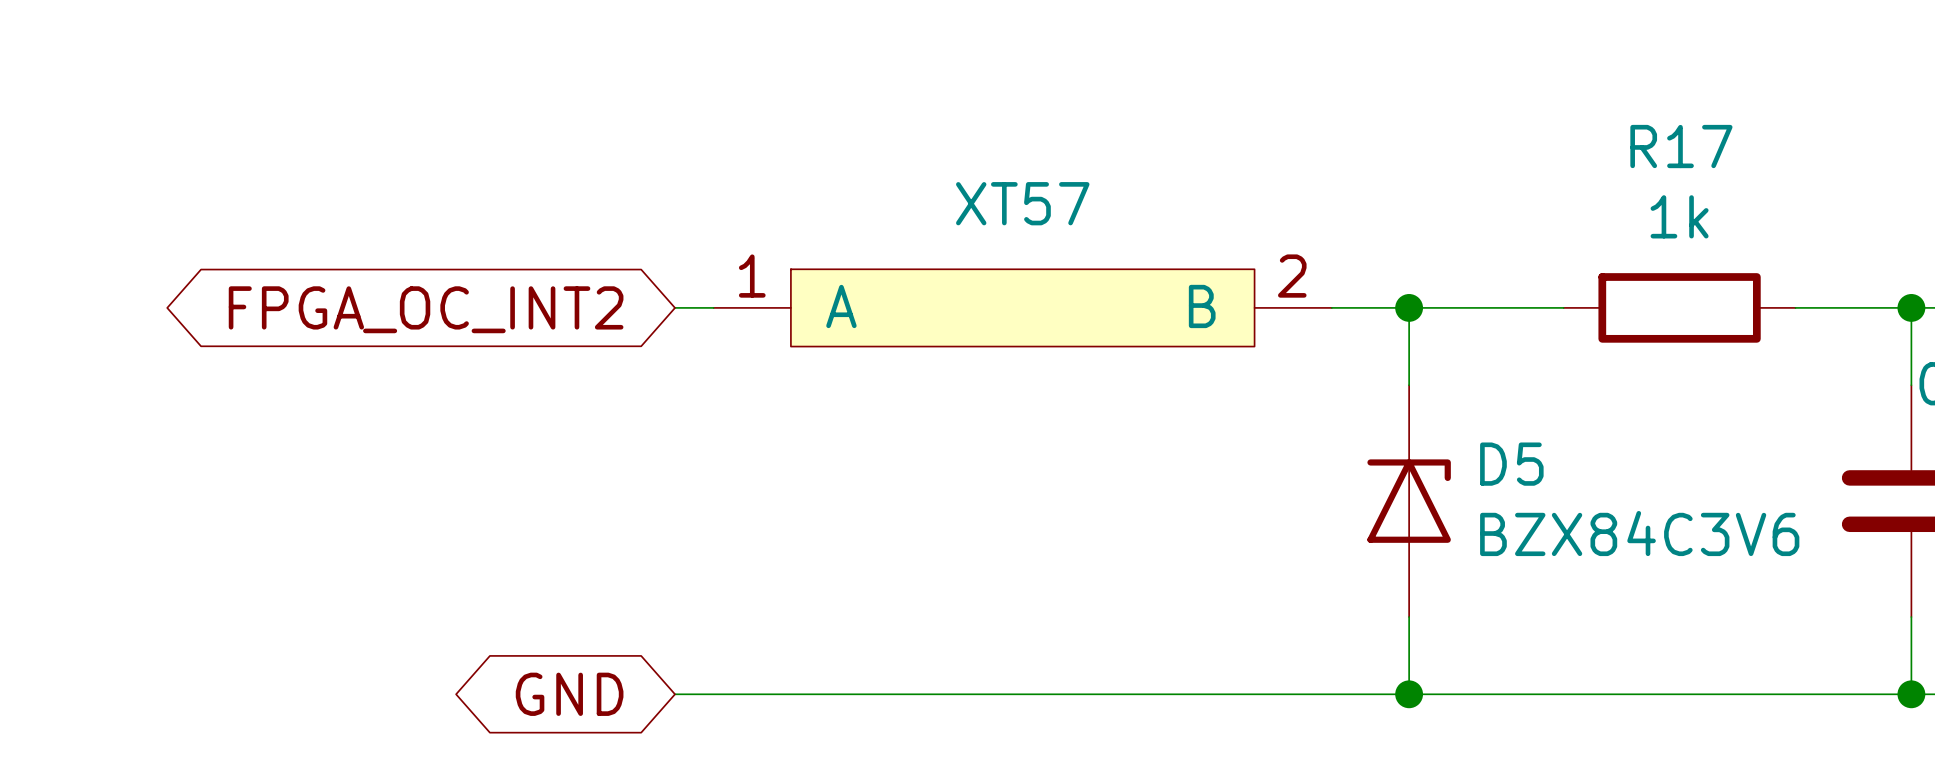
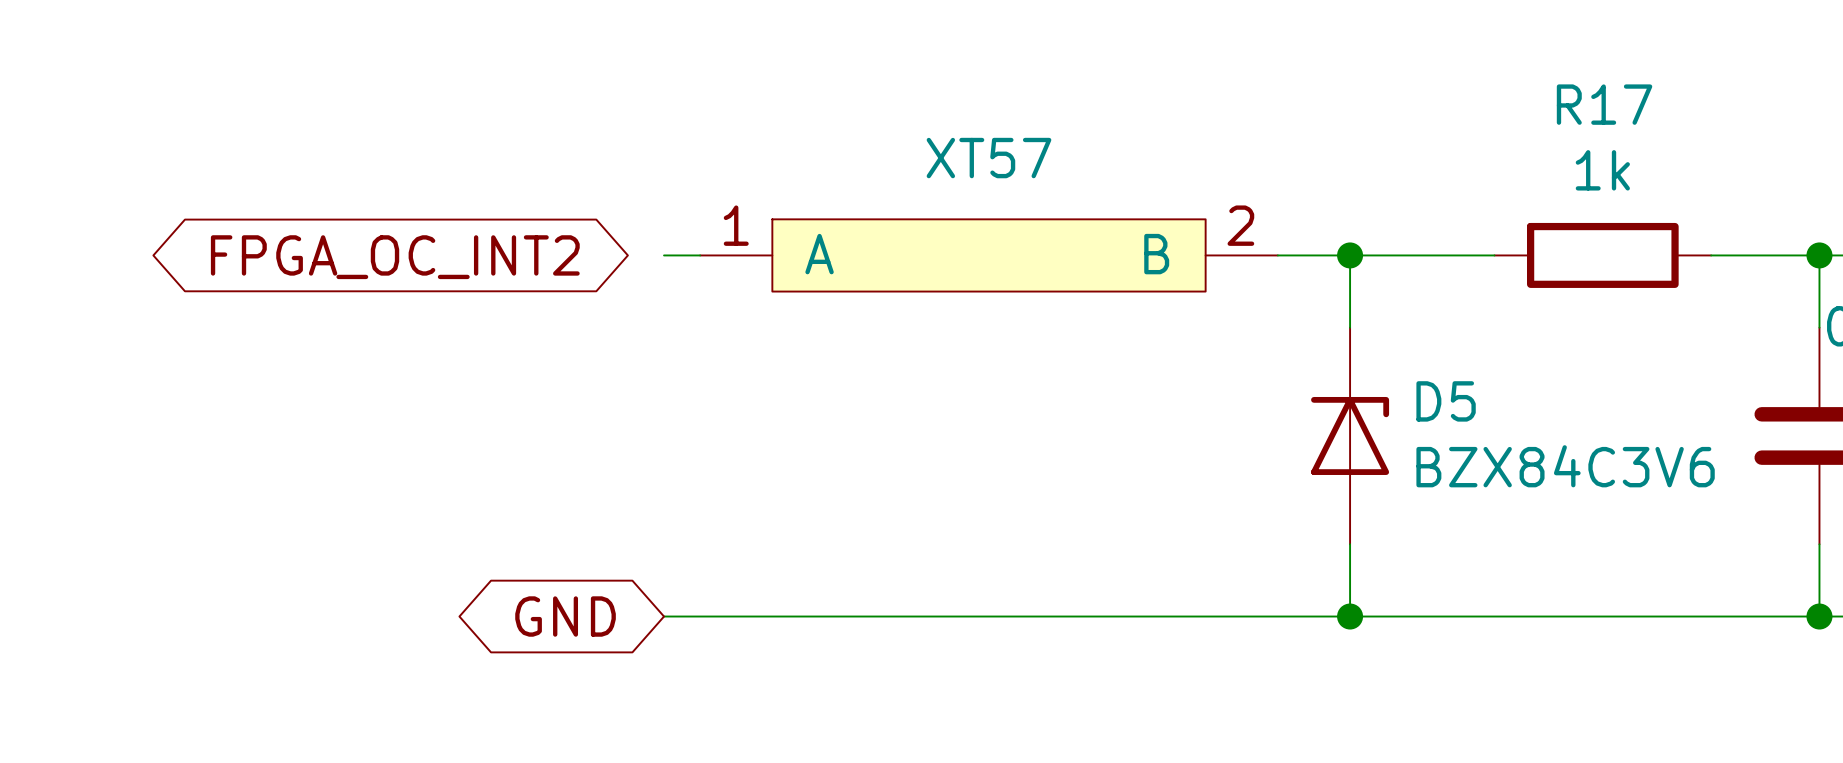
global label position: FPGA_OC_INT2 (426, 309) -> FPGA_OC_INT2 (395, 257)

